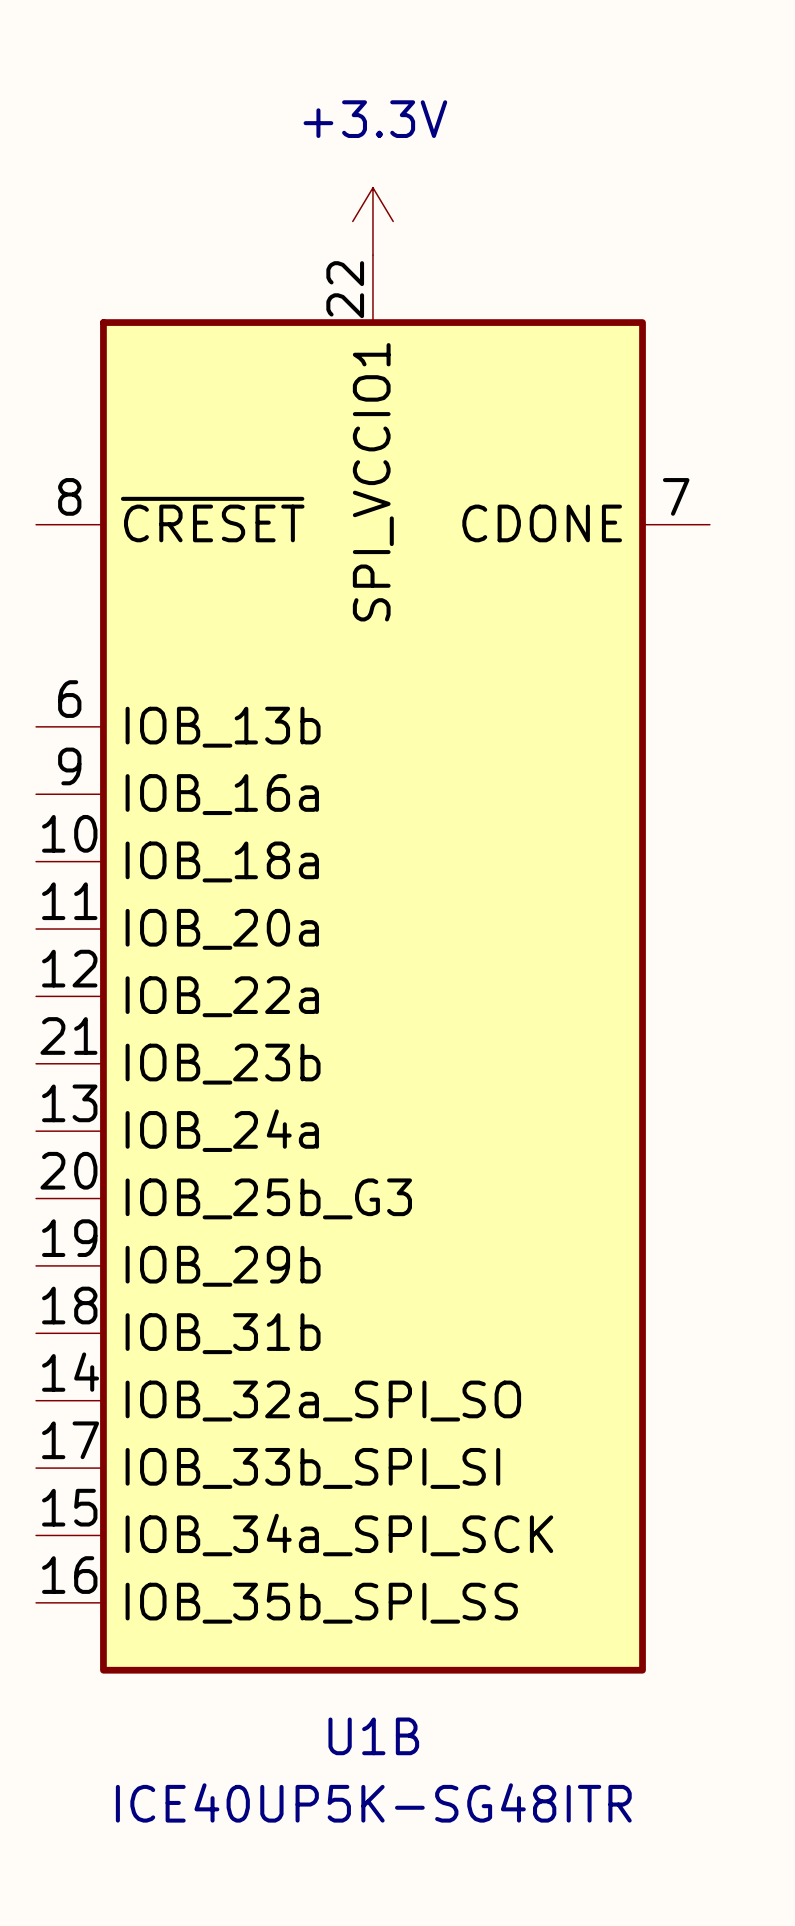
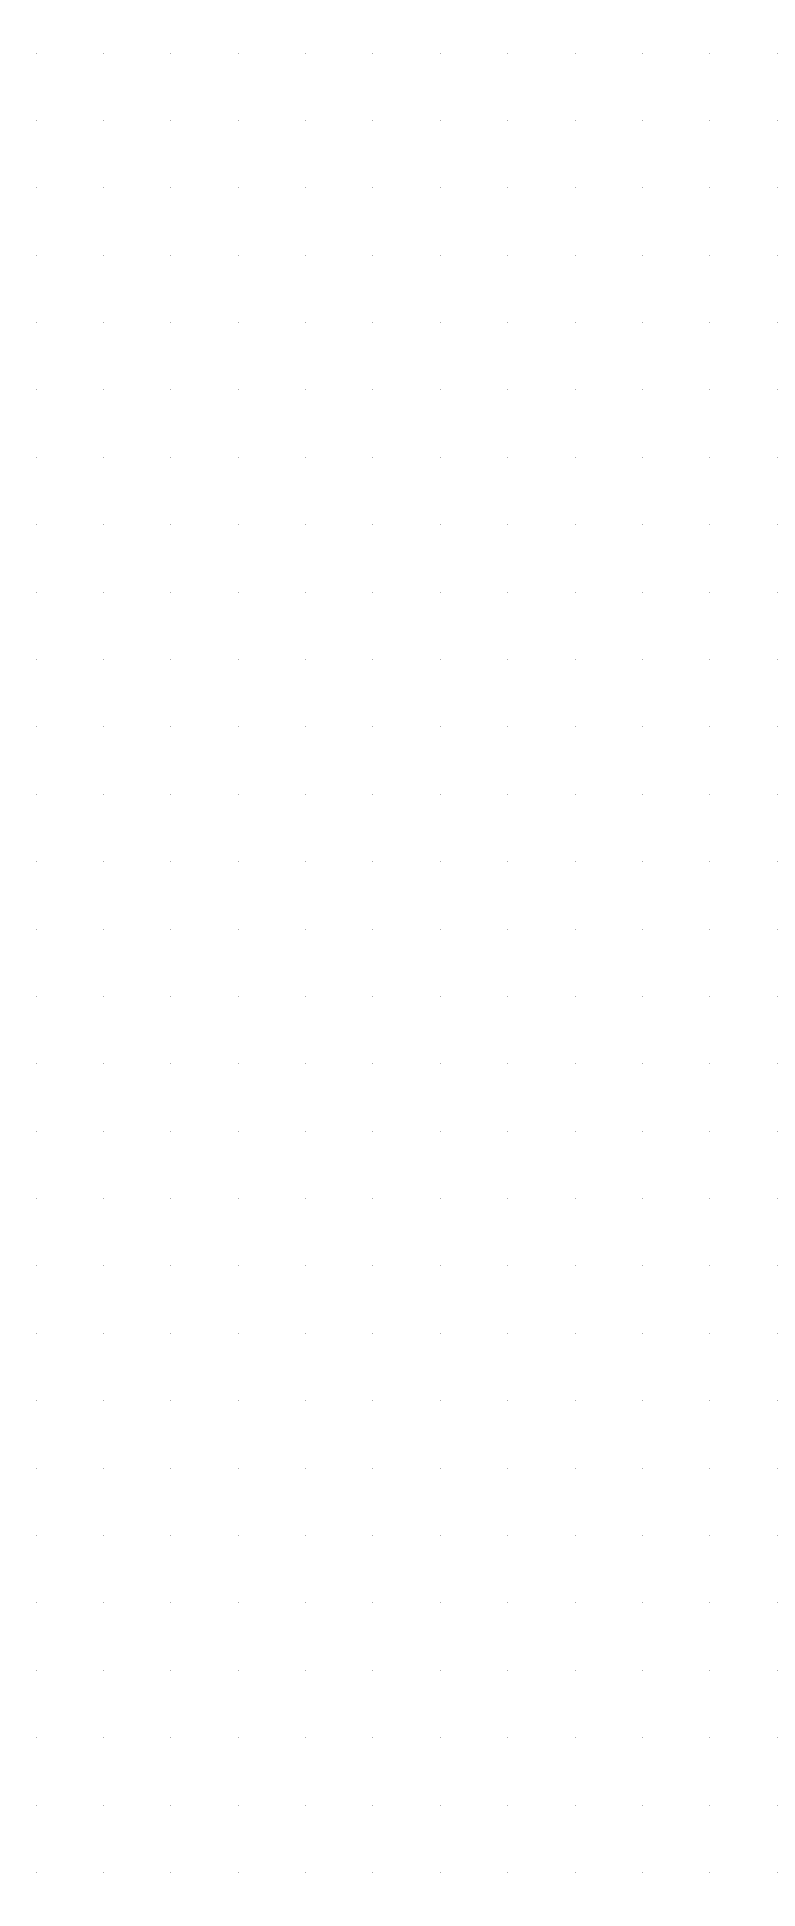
power symbol: +3.3V (372, 221) -> none
U1B: ICE40UP5K-SG48ITR (372, 964) -> none

